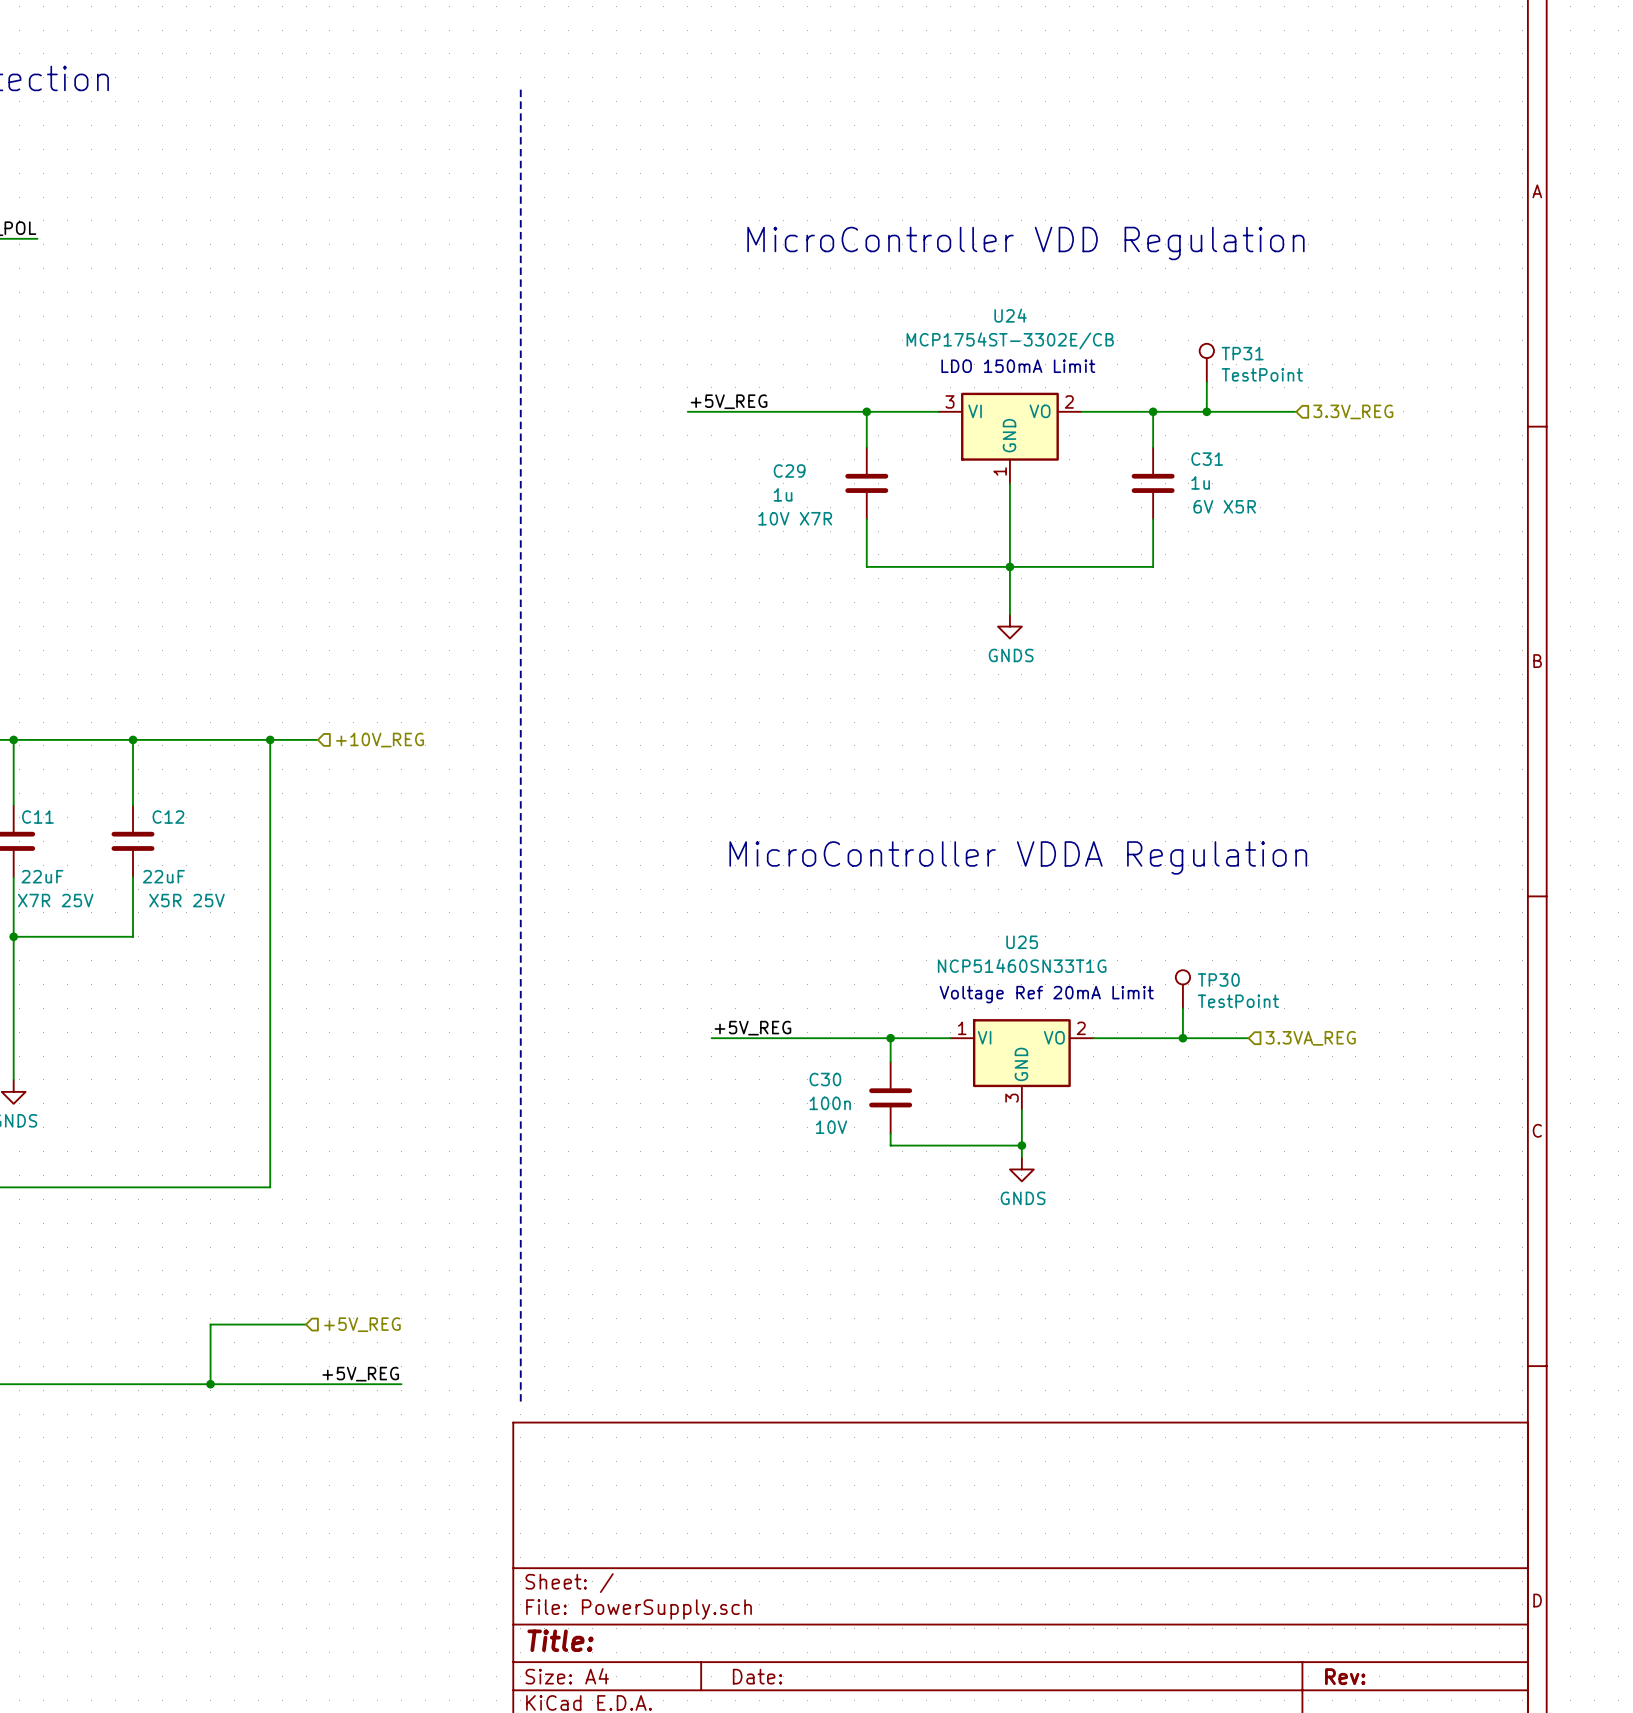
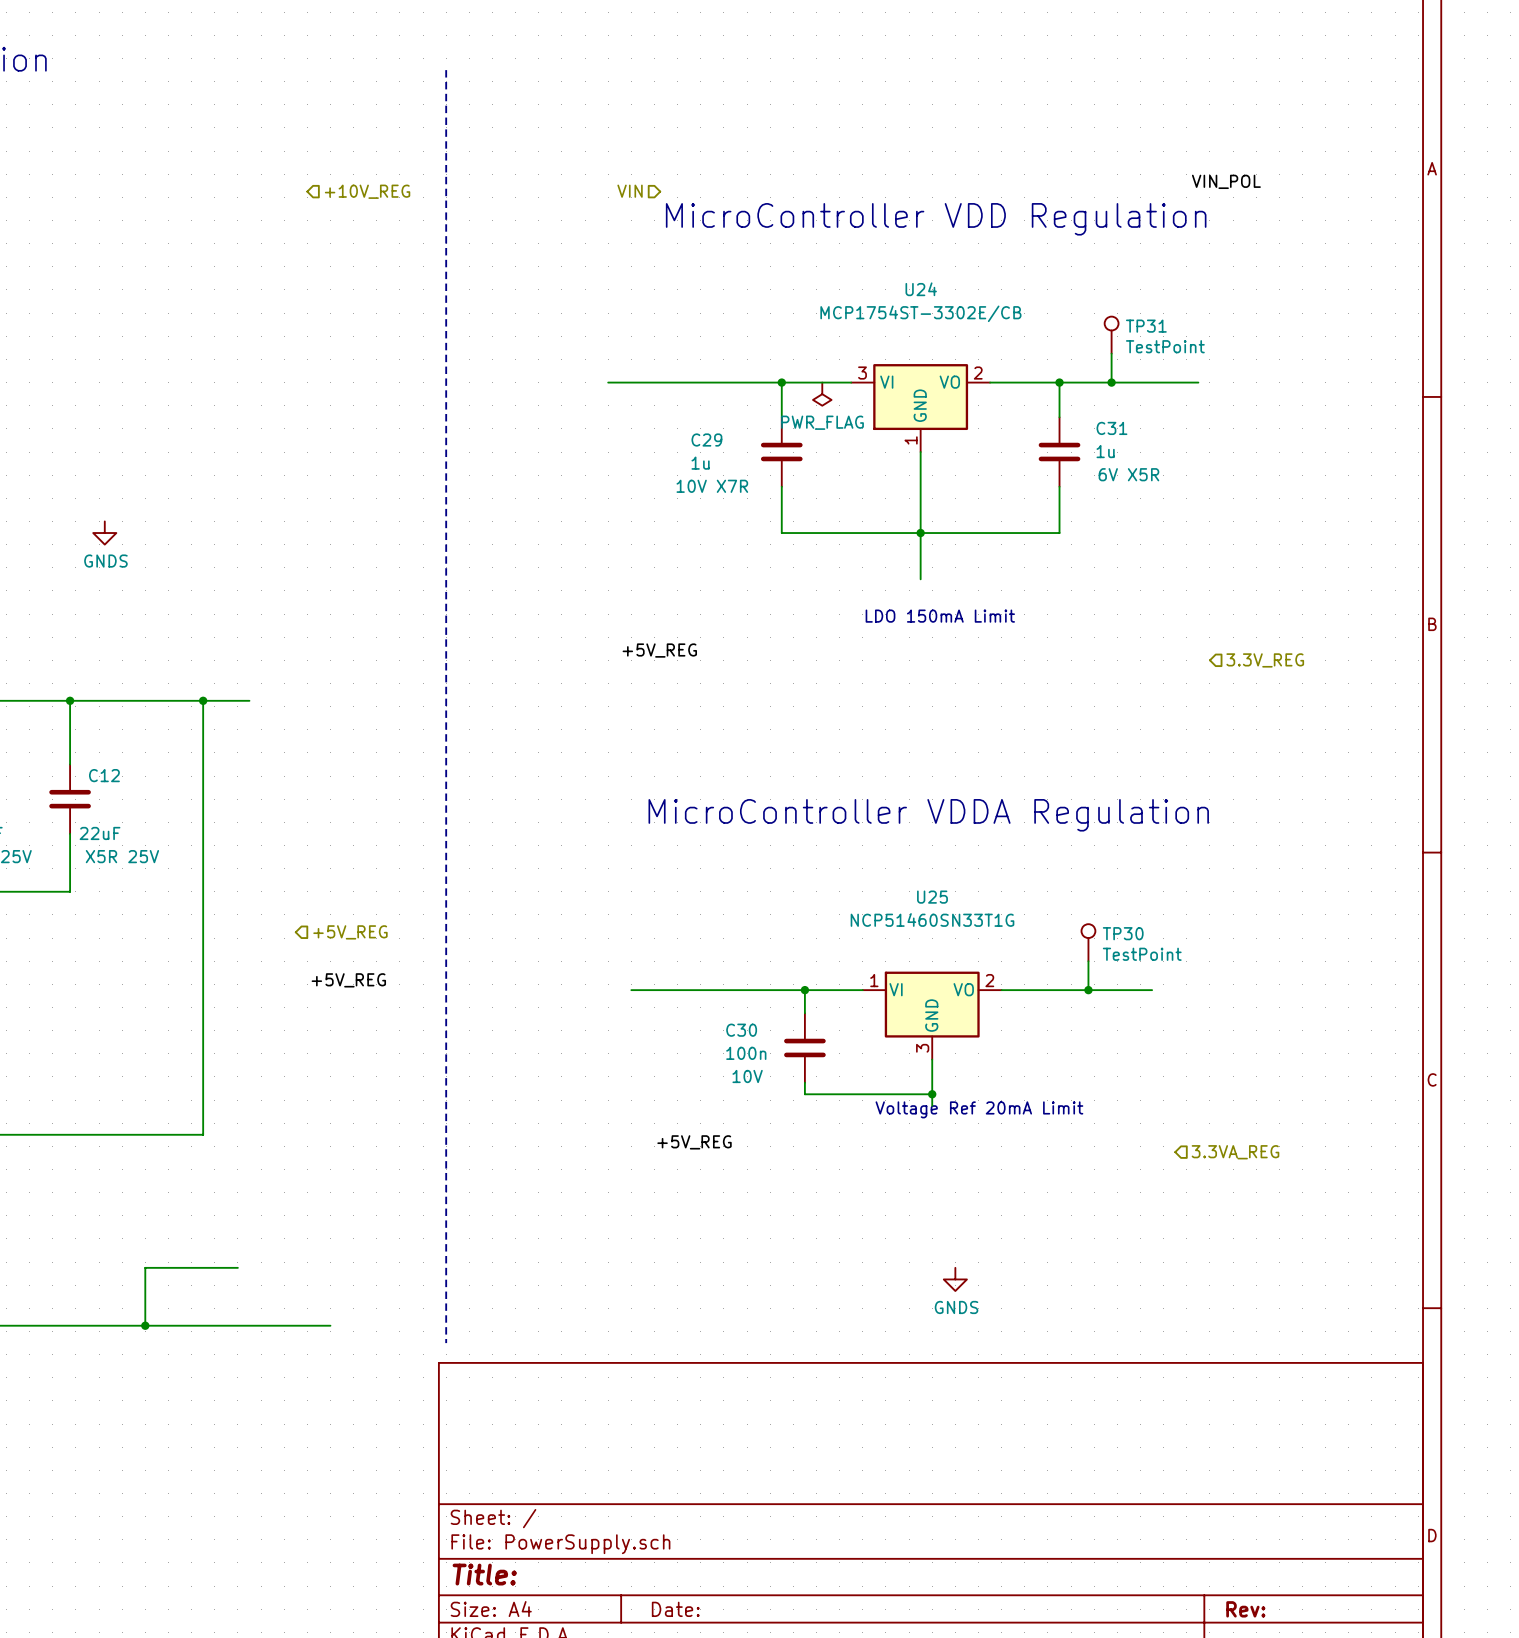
label: none -> VIN_POL (1226, 181)
hierarchical label: none -> VIN (630, 191)
hierarchical label: none -> +10V_REG (367, 191)
text: LDO 150mA Limit (1018, 366) -> none
label: +5V_REG (729, 401) -> none
hierarchical label: 3.3V_REG (1353, 411) -> none
power symbol: none -> PWR_FLAG (822, 394)
power symbol: none -> GNDS (104, 533)
power symbol: GNDS (1009, 626) -> none
text: none -> LDO 150mA Limit (940, 616)
label: none -> +5V_REG (659, 650)
hierarchical label: none -> 3.3V_REG (1265, 660)
hierarchical label: +10V_REG (380, 740) -> none
hierarchical label: none -> +5V_REG (350, 932)
text position: Voltage Ref 20mA Limit (1046, 994) -> Voltage Ref 20mA Limit (979, 1109)
label: none -> +5V_REG (348, 980)
label: +5V_REG (752, 1028) -> none
hierarchical label position: 3.3VA_REG (1310, 1038) -> 3.3VA_REG (1235, 1152)
power symbol position: GNDS (1021, 1169) -> GNDS (955, 1279)
label: none -> +5V_REG (694, 1142)
hierarchical label: +5V_REG (362, 1324) -> none
label: +5V_REG (360, 1374) -> none

